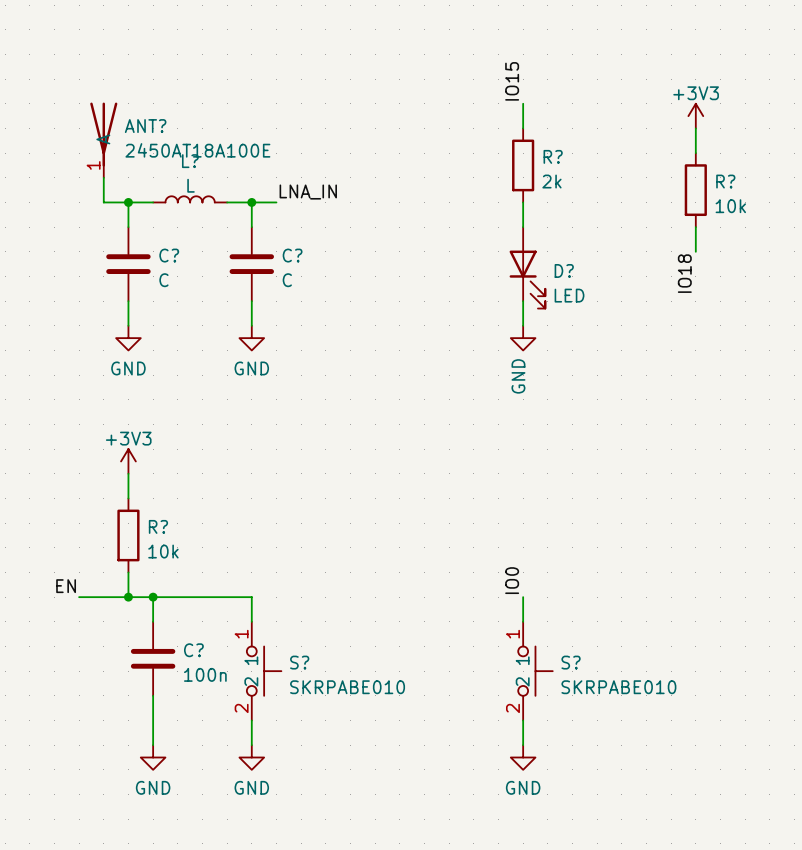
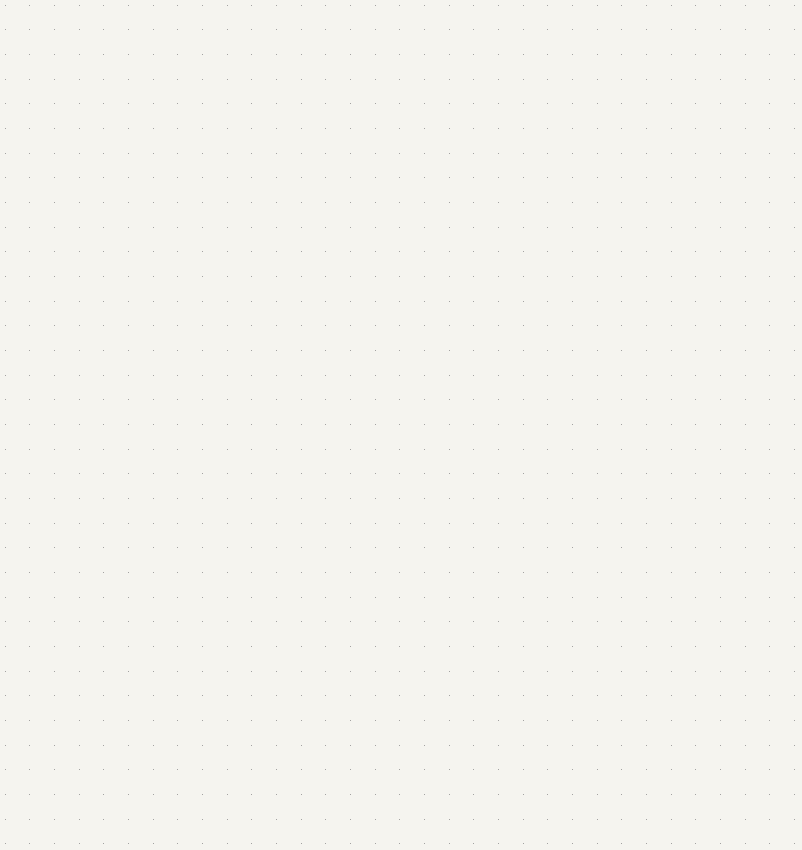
label: IO15 (512, 81) -> none
wire: (523, 103) (523, 128) -> none
power symbol: +3V3 (695, 116) -> none
wire: (695, 128) (695, 153) -> none
ANT?: 2450AT18A100E (103, 140) -> none
R?: 2k (523, 165) -> none
wire: (103, 177) (103, 202) (153, 202) -> none
R?: 10k (695, 190) -> none
label: LNA_IN (308, 192) -> none
L?: L (190, 199) -> none
wire: (128, 202) (128, 227) -> none
junction: (128, 202) -> none
wire: (227, 202) (276, 202) -> none
wire: (251, 202) (251, 227) -> none
junction: (251, 202) -> none
wire: (523, 202) (523, 227) -> none
wire: (695, 227) (695, 251) -> none
C?: C (128, 264) -> none
C?: C (251, 264) -> none
D?: LED (527, 267) -> none
label: IO18 (684, 273) -> none
wire: (128, 301) (128, 325) -> none
wire: (251, 301) (251, 325) -> none
wire: (523, 301) (523, 325) -> none
power symbol: GND (128, 338) -> none
power symbol: GND (251, 338) -> none
power symbol: GND (523, 338) -> none
power symbol: +3V3 (128, 461) -> none
wire: (128, 473) (128, 498) -> none
R?: 10k (128, 535) -> none
wire: (128, 572) (128, 597) -> none
label: IO0 (512, 580) -> none
label: EN (66, 586) -> none
wire: (79, 597) (251, 597) (251, 621) -> none
junction: (128, 597) -> none
wire: (153, 597) (153, 621) -> none
junction: (153, 597) -> none
wire: (523, 597) (523, 621) -> none
C?: 100n (153, 658) -> none
S?: SKRPABE010 (264, 671) -> none
S?: SKRPABE010 (535, 671) -> none
wire: (153, 695) (153, 745) -> none
wire: (251, 720) (251, 745) -> none
wire: (523, 720) (523, 745) -> none
power symbol: GND (153, 757) -> none
power symbol: GND (251, 757) -> none
power symbol: GND (523, 757) -> none

